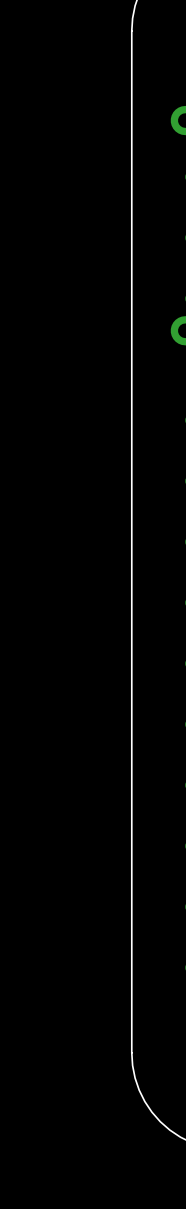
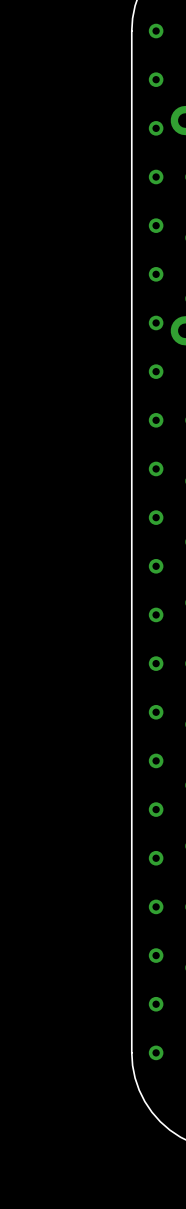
via: none -> (156, 31)
via: none -> (156, 79)
via: none -> (156, 128)
via: none -> (156, 177)
via: none -> (156, 225)
via: none -> (156, 274)
via: none -> (156, 322)
via: none -> (156, 371)
via: none -> (156, 420)
via: none -> (156, 468)
via: none -> (156, 517)
via: none -> (156, 566)
via: none -> (156, 614)
via: none -> (156, 663)
via: none -> (156, 712)
via: none -> (156, 760)
via: none -> (156, 809)
via: none -> (156, 858)
via: none -> (156, 906)
via: none -> (156, 955)
via: none -> (156, 1004)
via: none -> (156, 1052)

